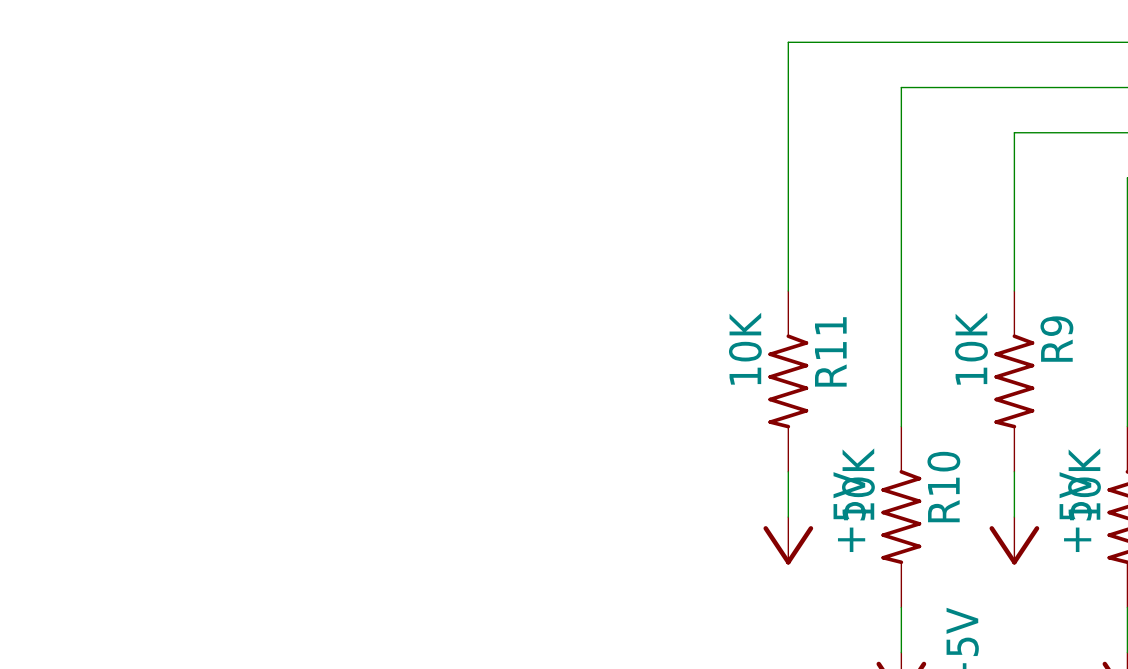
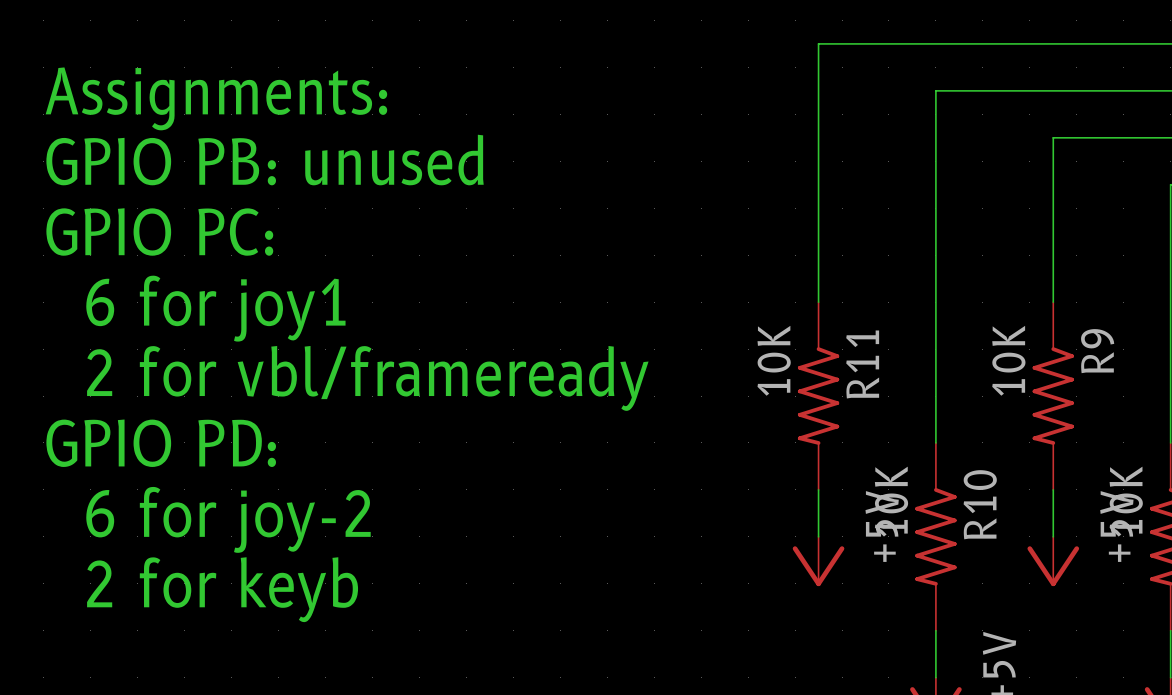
text: none -> Assignments: (216, 98)
text: none -> GPIO PB: unused (265, 160)
text: none -> GPIO PC: (159, 231)
text: none -> 6 for joy1 (215, 308)
text: none -> 2 for vbl/frameready (367, 378)
text: none -> GPIO PD: (161, 443)
text: none -> 6 for joy-2 (228, 519)
text: none -> 2 for keyb (222, 589)

